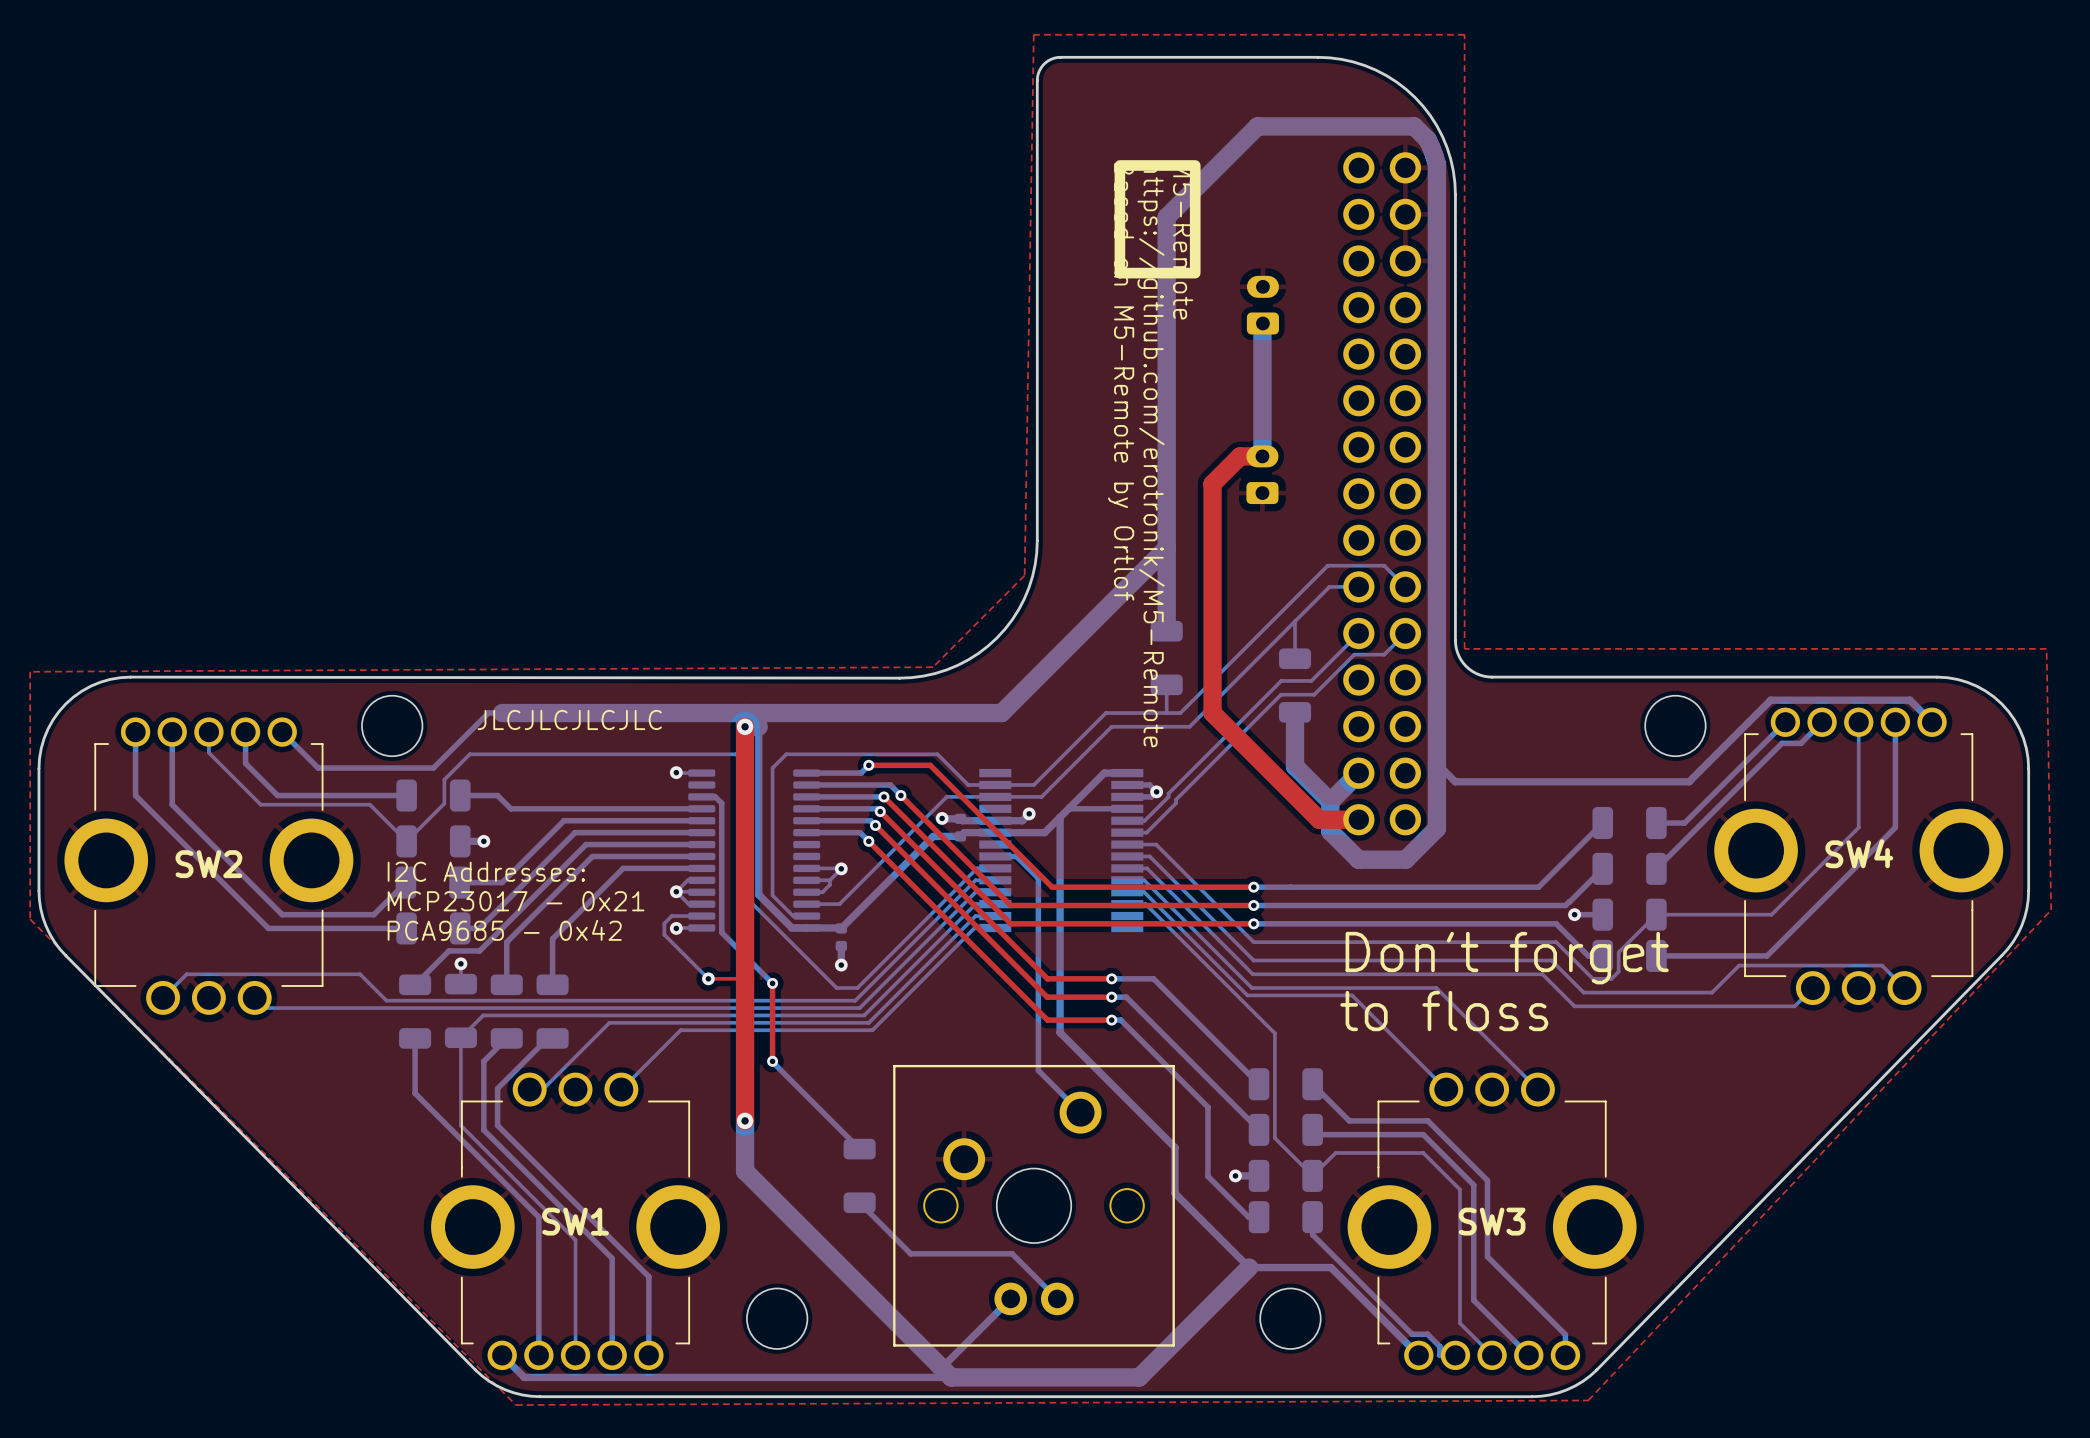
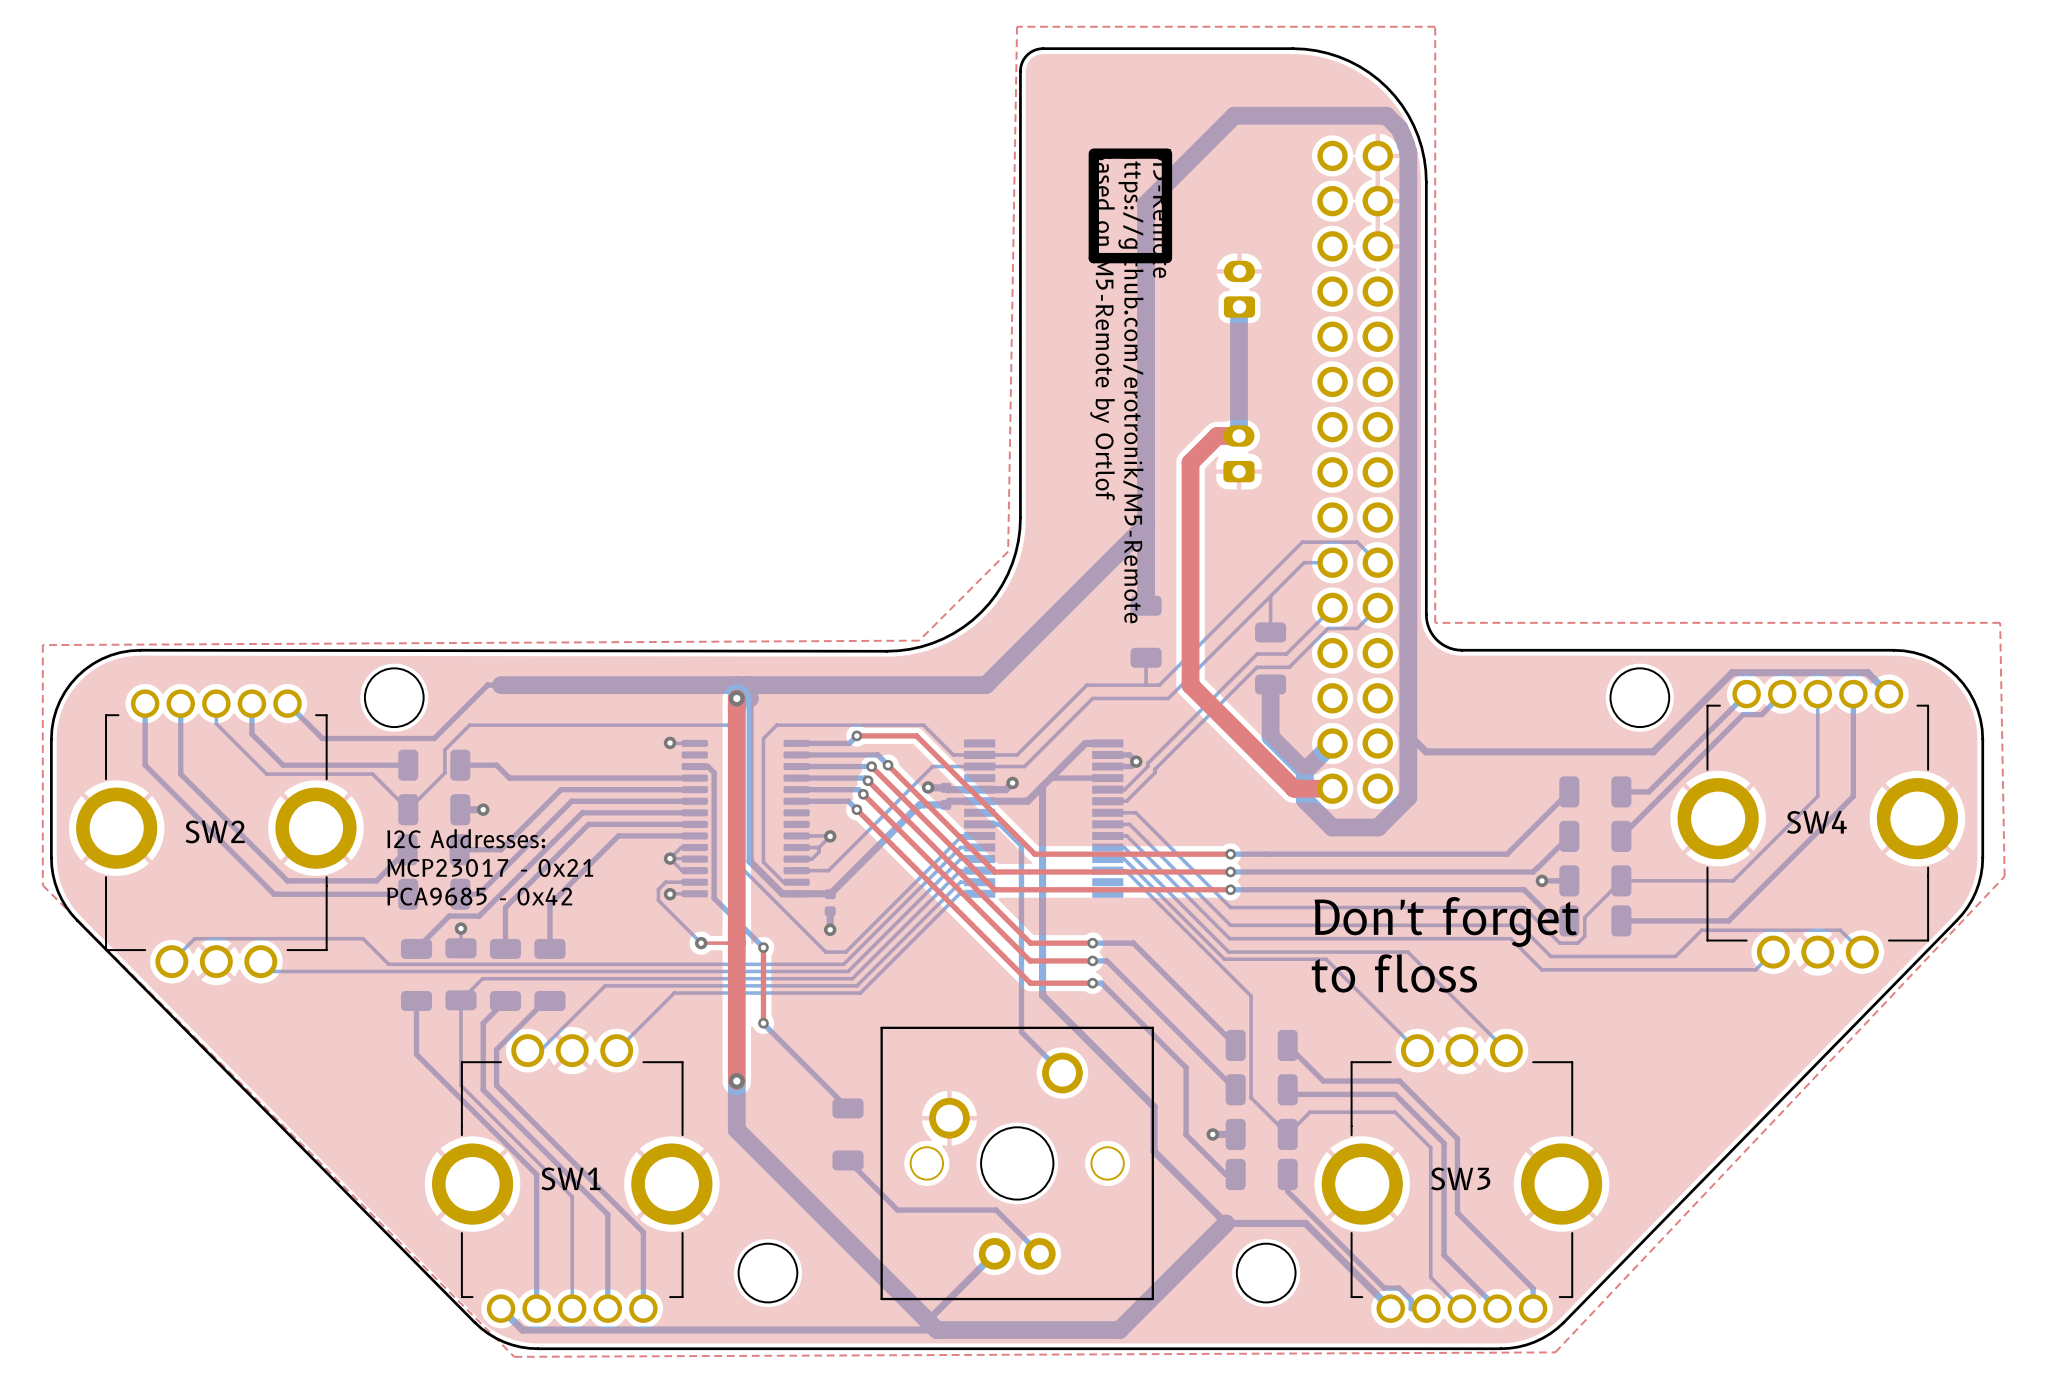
text: JLCJLCJLCJLC (569, 719) -> none

